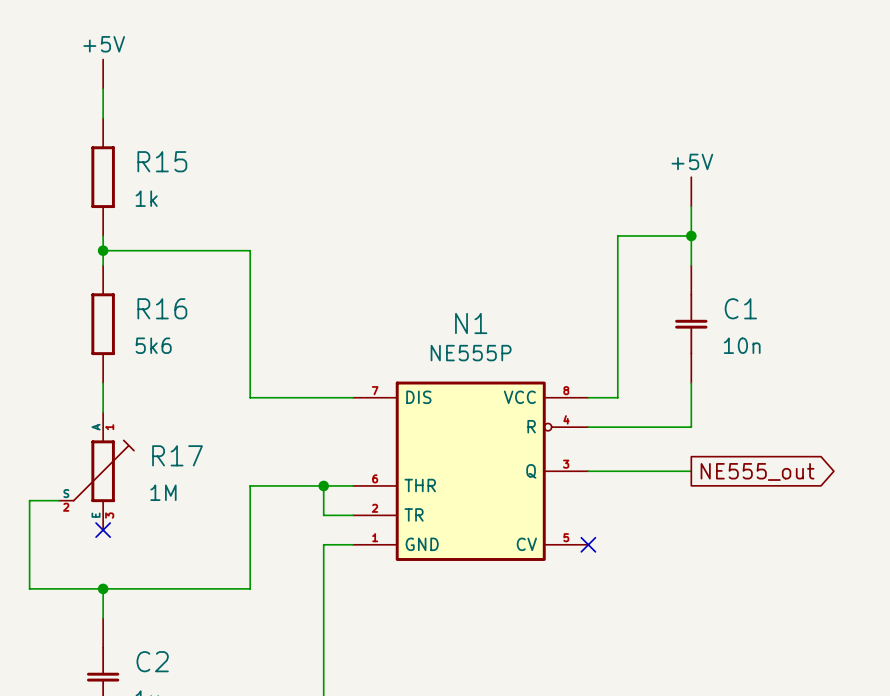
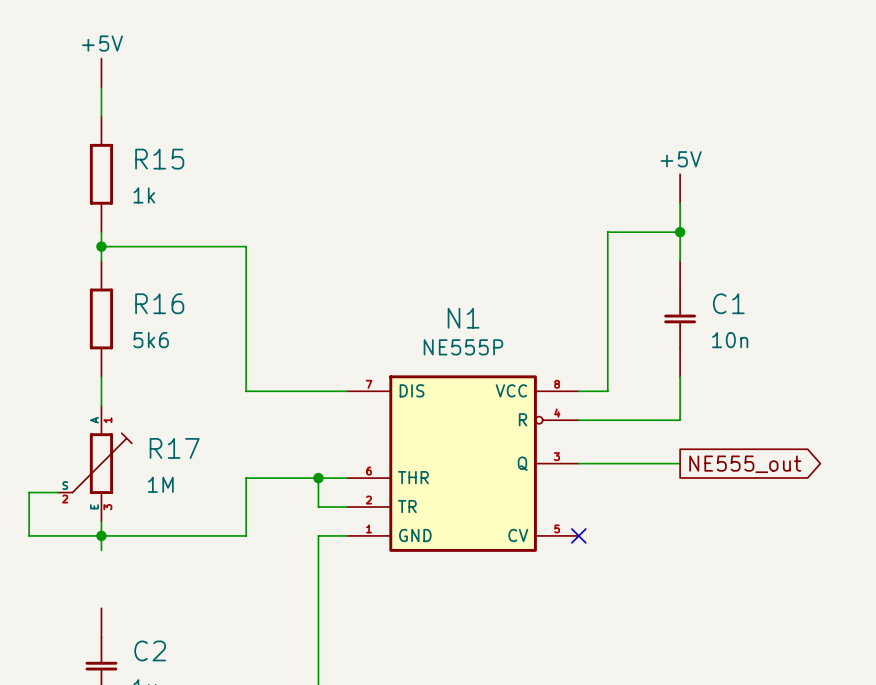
no-connect mark: (103, 530) -> none
wire: (29, 544) (29, 588) (250, 588) (250, 544) -> (29, 535) (246, 535)
wire: (103, 588) (103, 618) -> (101, 521) (101, 550)
junction position: (103, 588) -> (101, 535)

